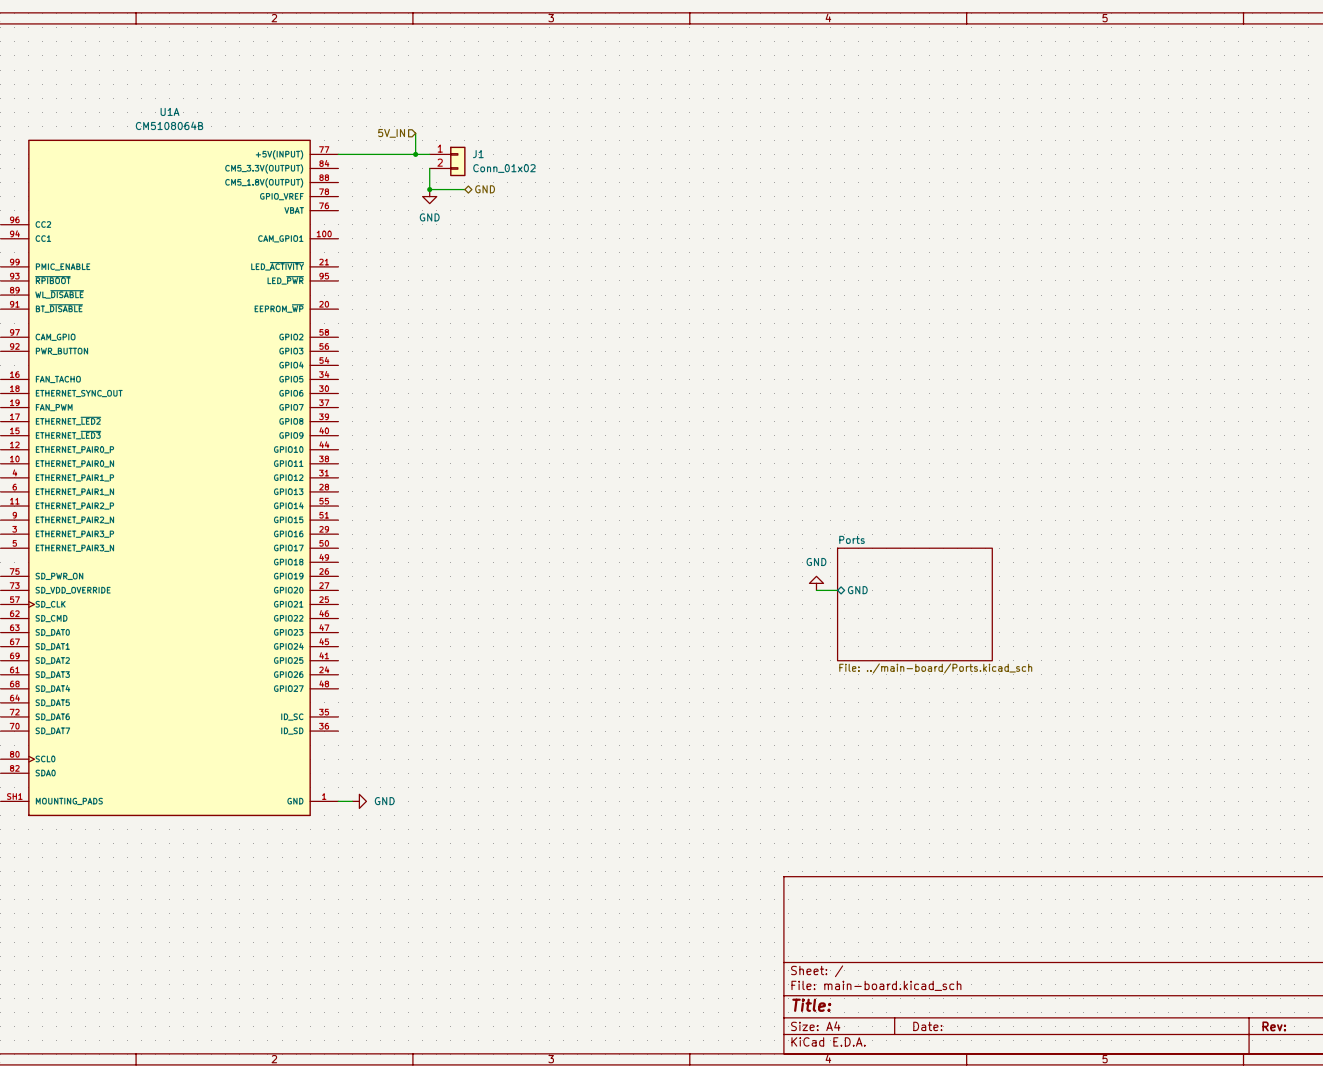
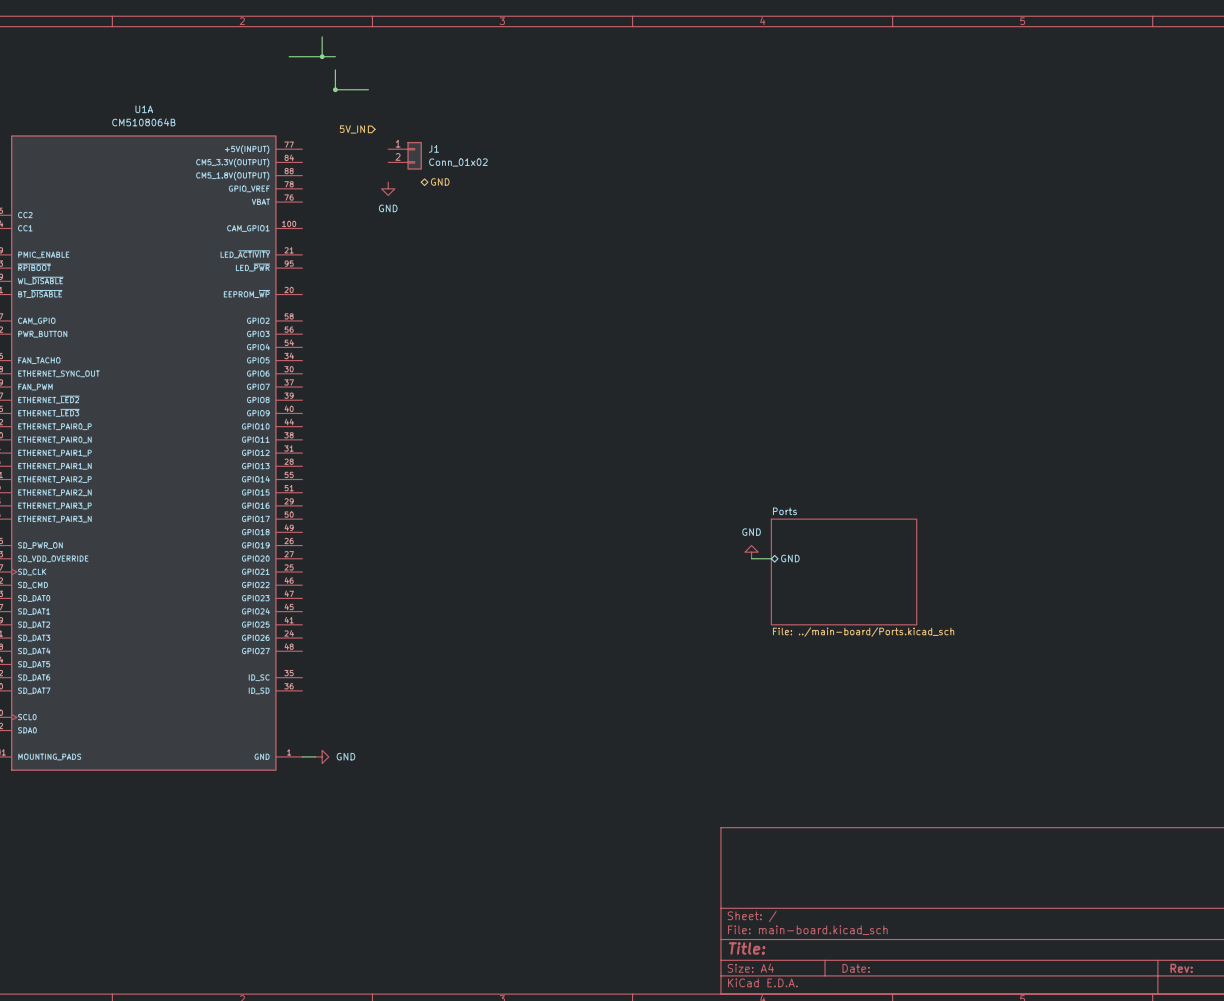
wire: none -> (289, 56) (335, 56)
junction: none -> (322, 56)
junction: none -> (335, 89)
wire: (415, 133) (415, 154) -> (322, 36) (322, 56)
wire: (338, 154) (429, 154) -> none
junction: (415, 154) -> none
wire: (429, 168) (429, 189) (464, 189) -> (335, 69) (335, 89) (368, 89)
junction: (429, 189) -> none

